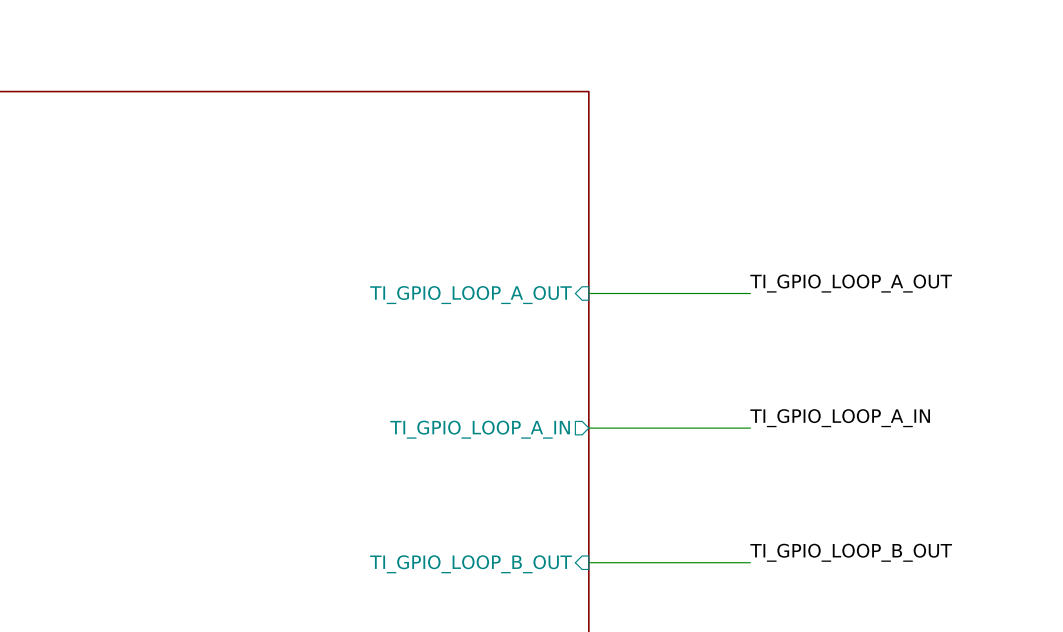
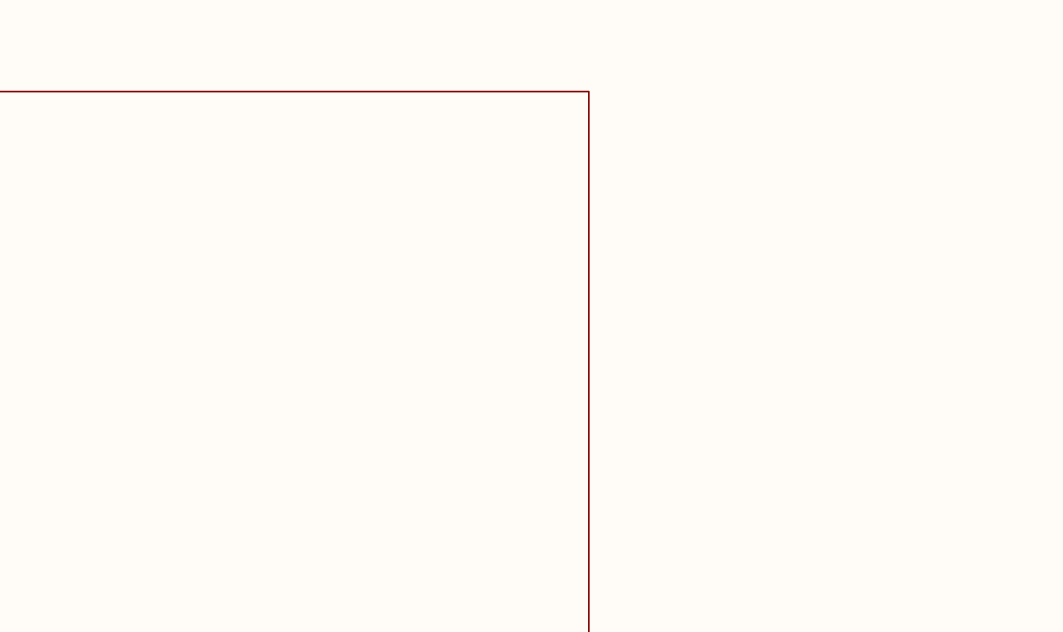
label: TI_GPIO_LOOP_A_OUT (851, 283) -> none
wire: (588, 293) (750, 293) -> none
sheet pin: TI_GPIO_LOOP_A_OUT (470, 295) -> none
label: TI_GPIO_LOOP_A_IN (840, 418) -> none
wire: (588, 428) (750, 428) -> none
sheet pin: TI_GPIO_LOOP_A_IN (480, 429) -> none
label: TI_GPIO_LOOP_B_OUT (851, 552) -> none
wire: (588, 562) (750, 562) -> none
sheet pin: TI_GPIO_LOOP_B_OUT (470, 564) -> none

